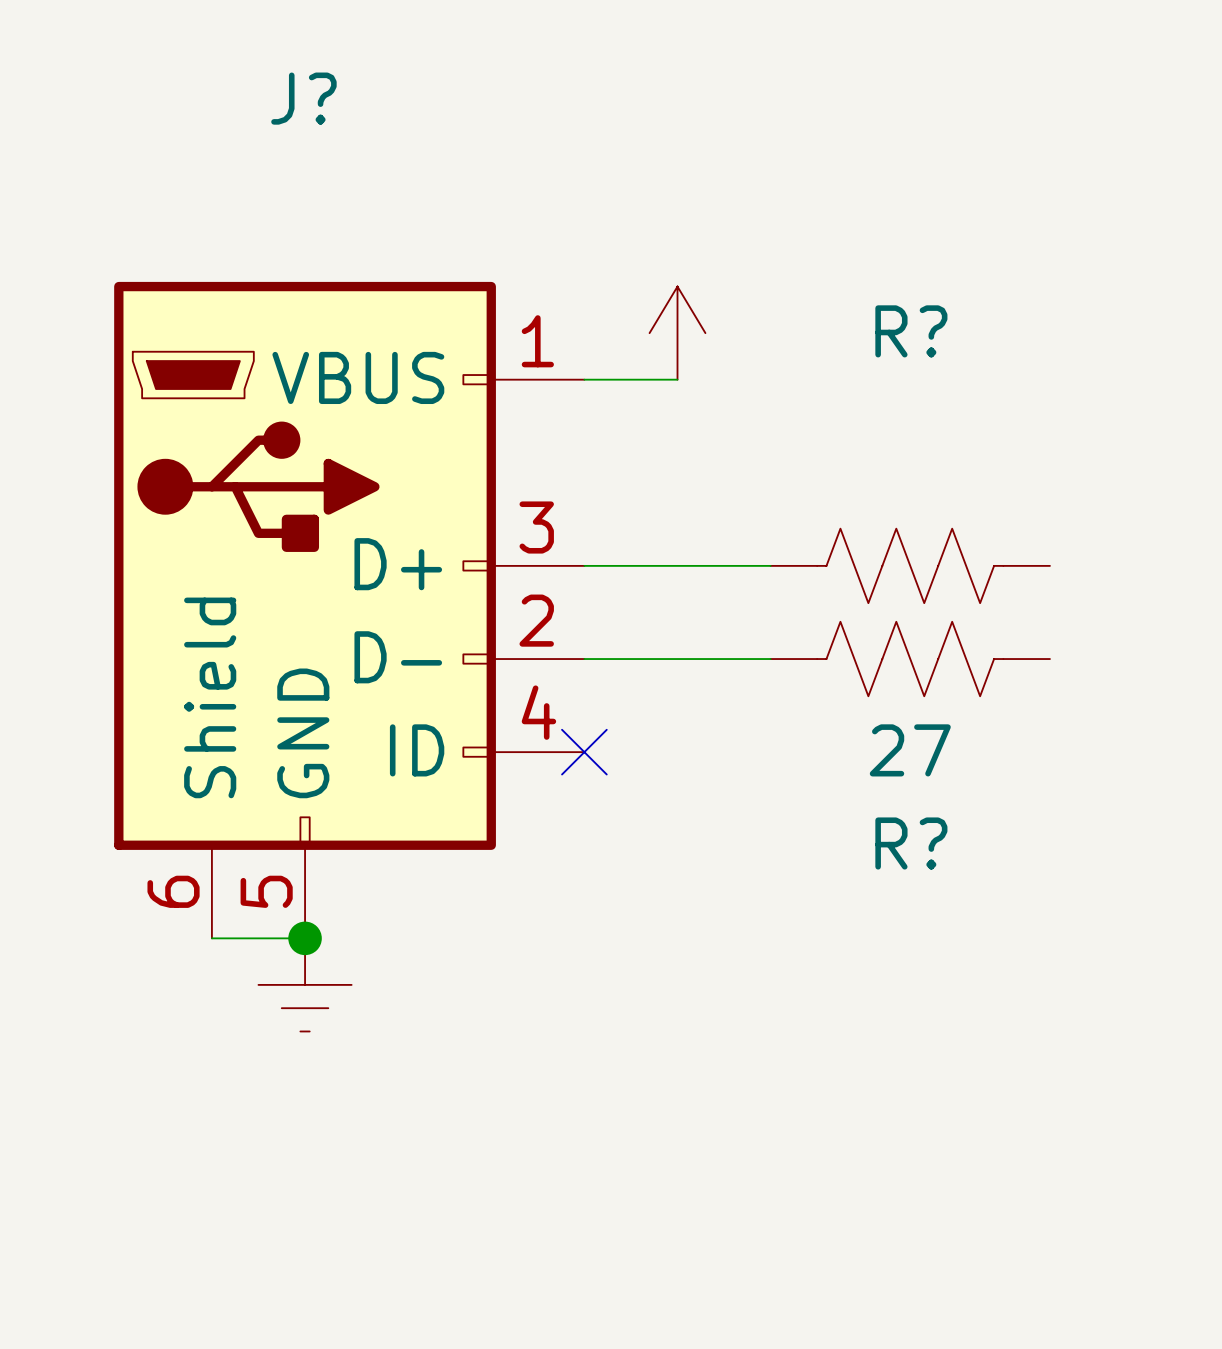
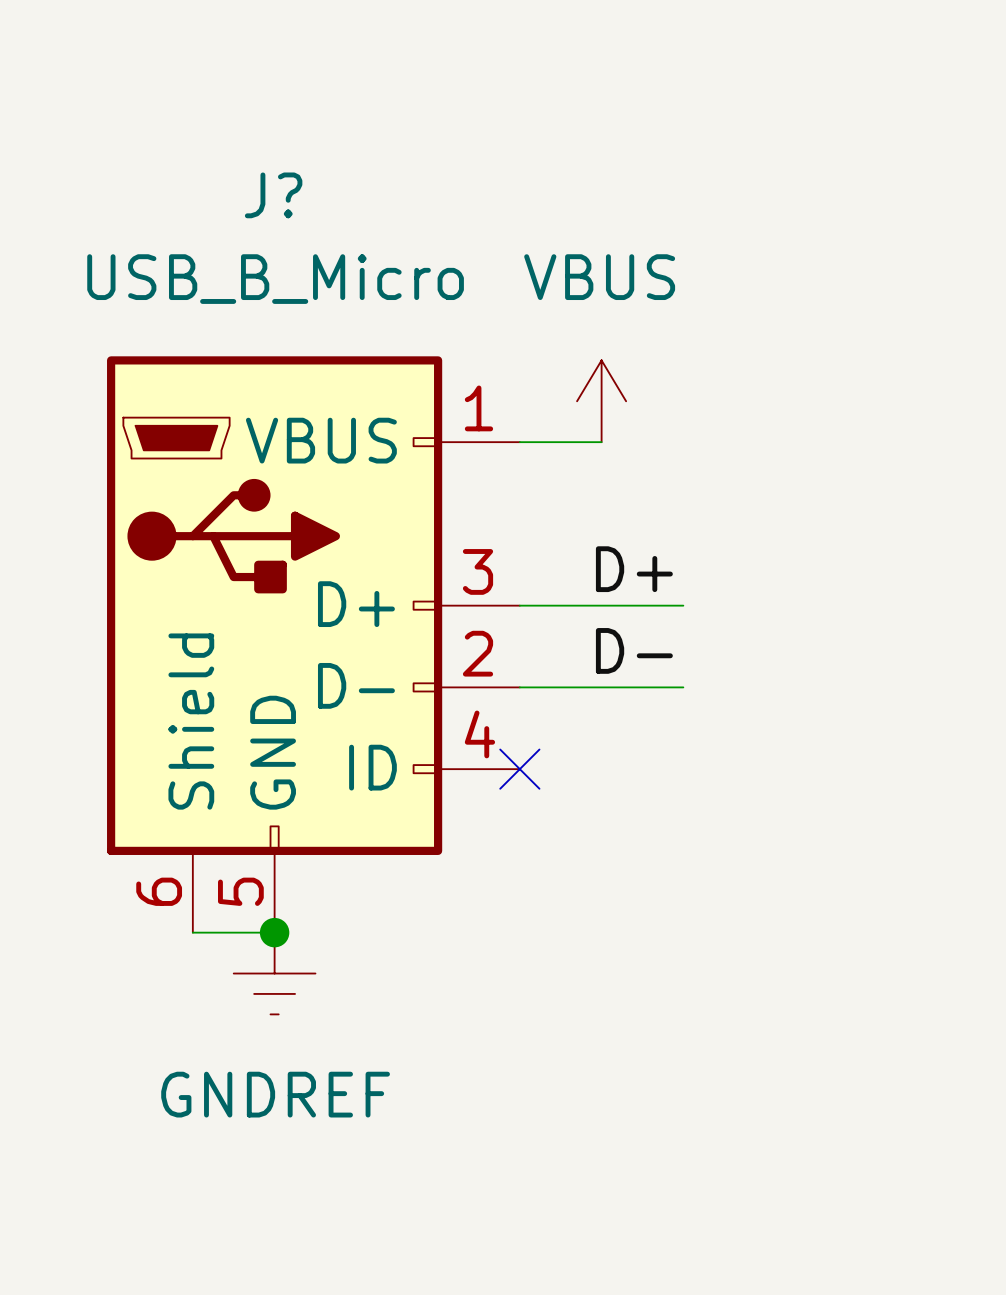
power symbol text: none -> VBUS (599, 277)
J? value: none -> USB_B_Micro (275, 279)
label: none -> D+ (634, 569)
R?: (910, 565) -> none
label: none -> D- (634, 650)
R?: 27 (910, 659) -> none
power symbol text: none -> GNDREF (275, 1094)

